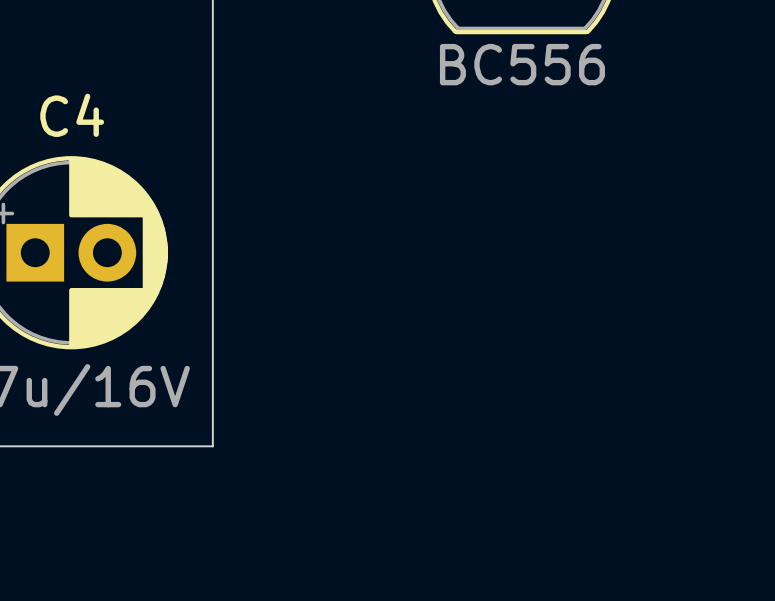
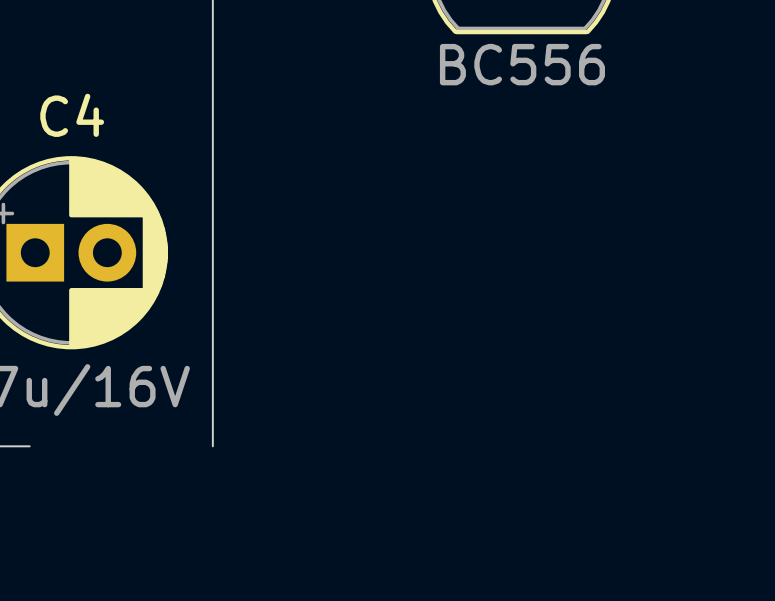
board edge: (29, 446) (212, 446) -> none

